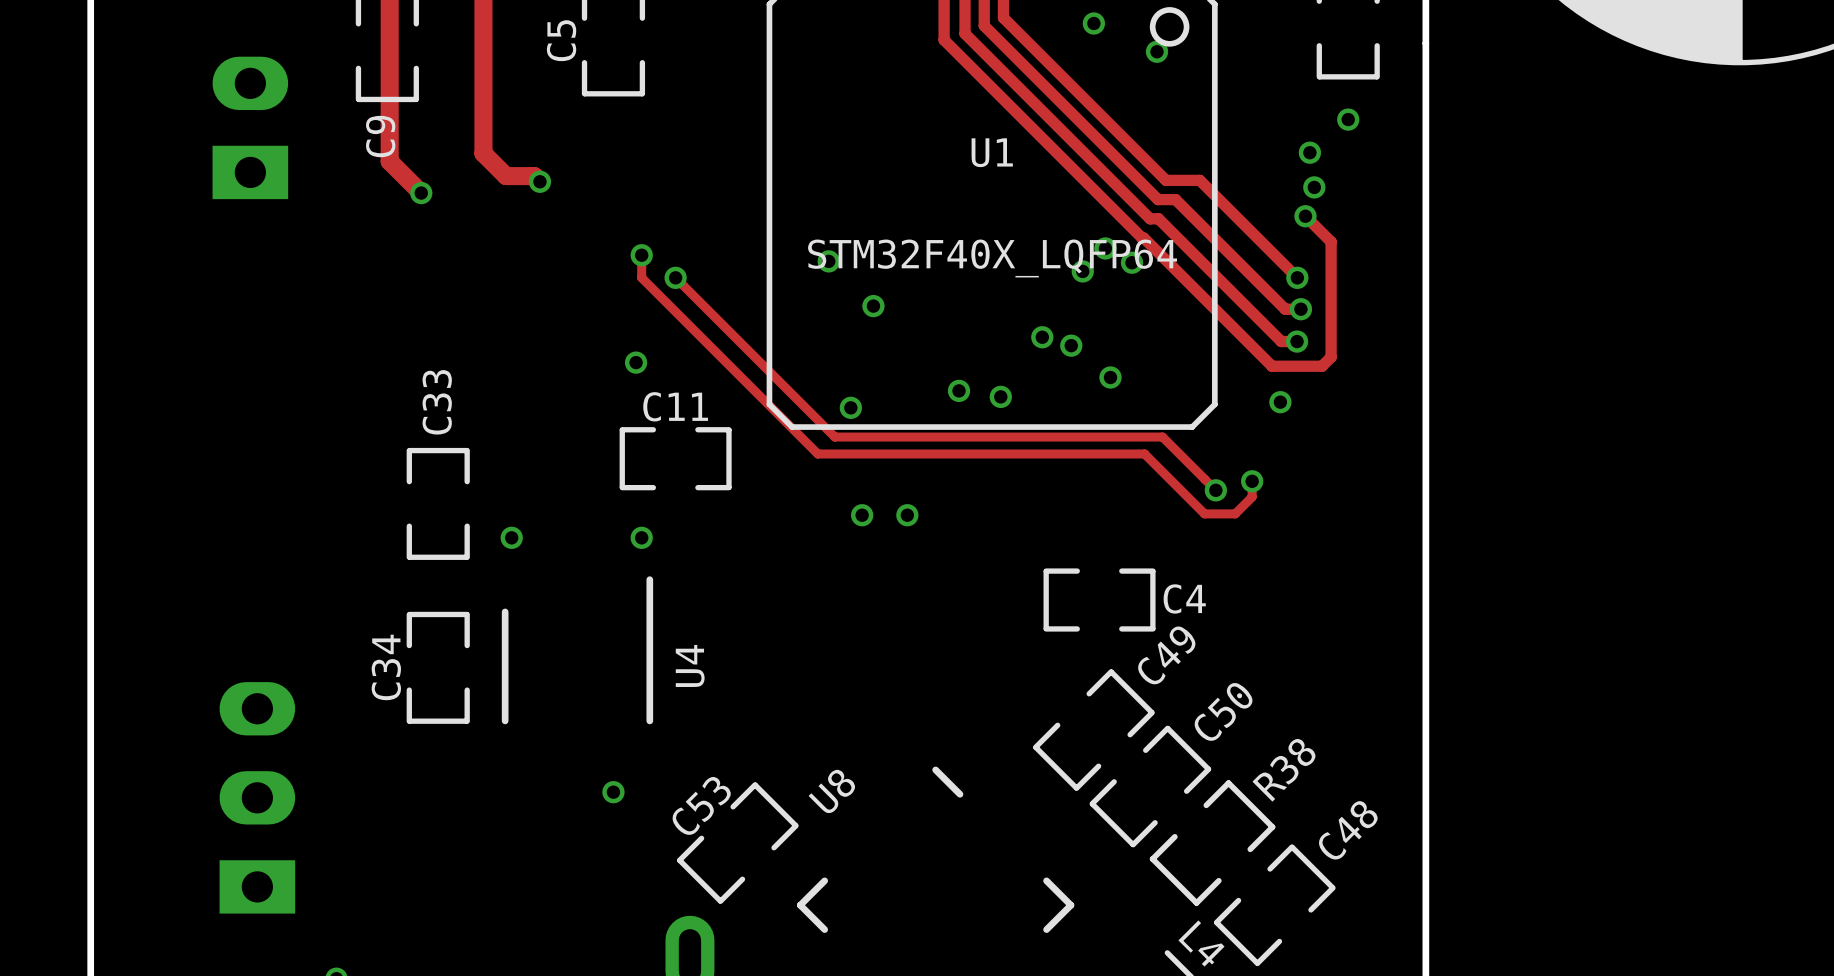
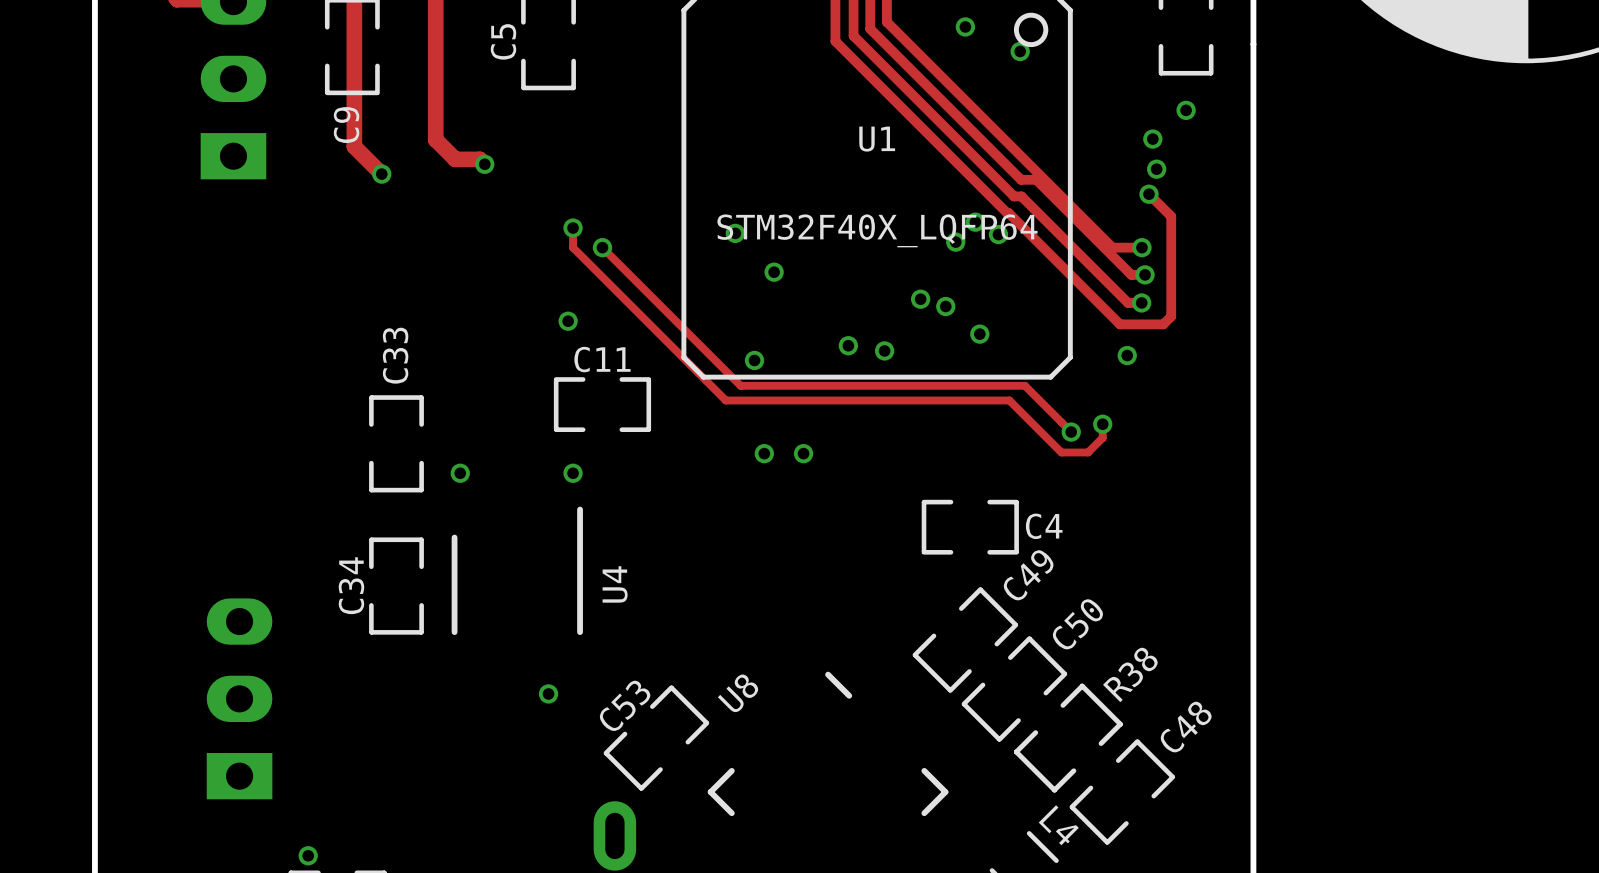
track: (1165, 180) (1199, 180) (1297, 277) -> (1027, 163) (1112, 247) (1141, 247)

